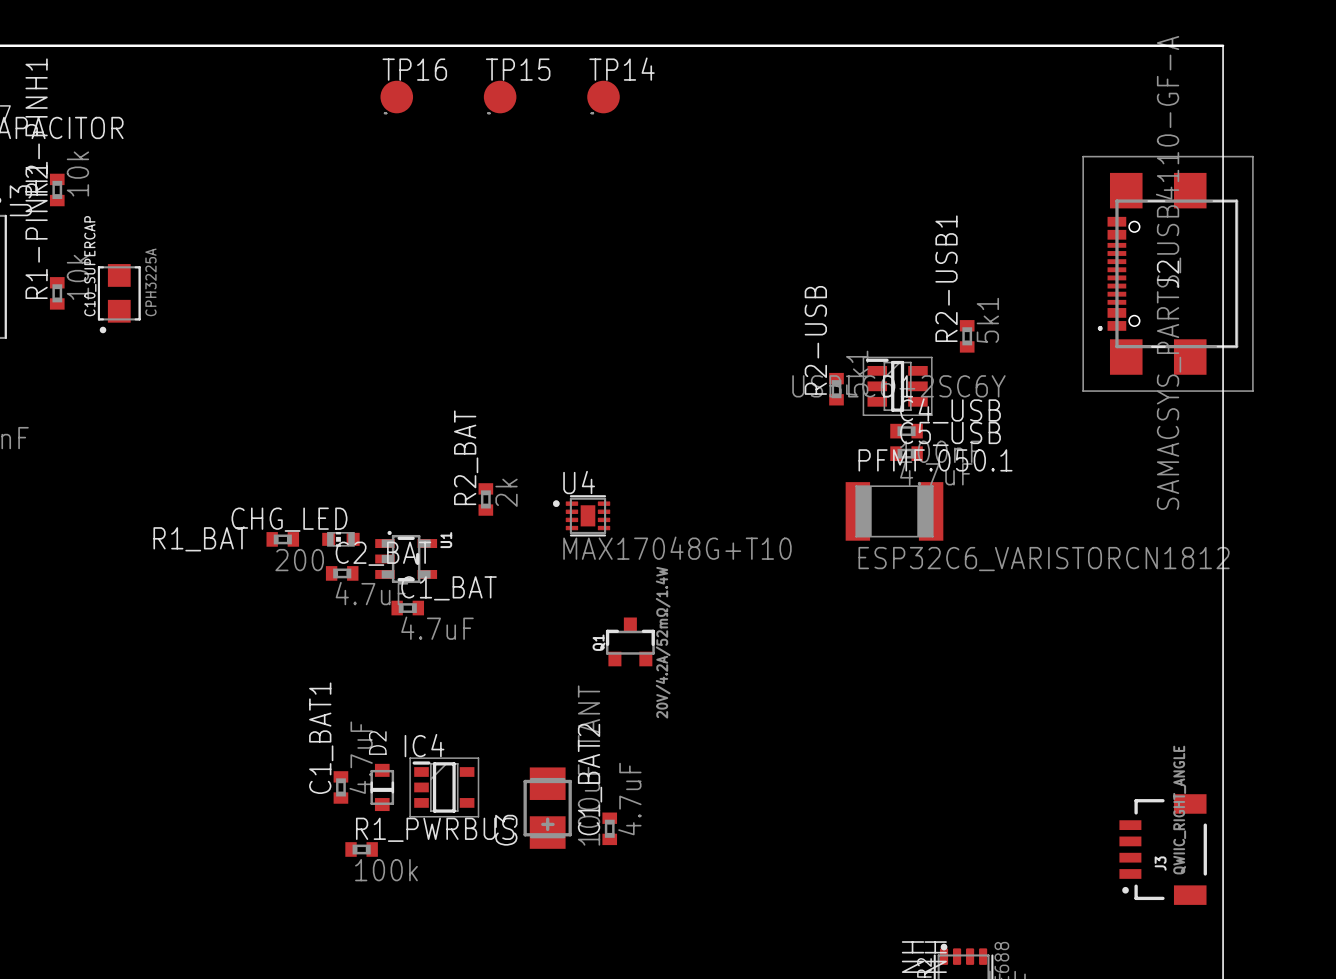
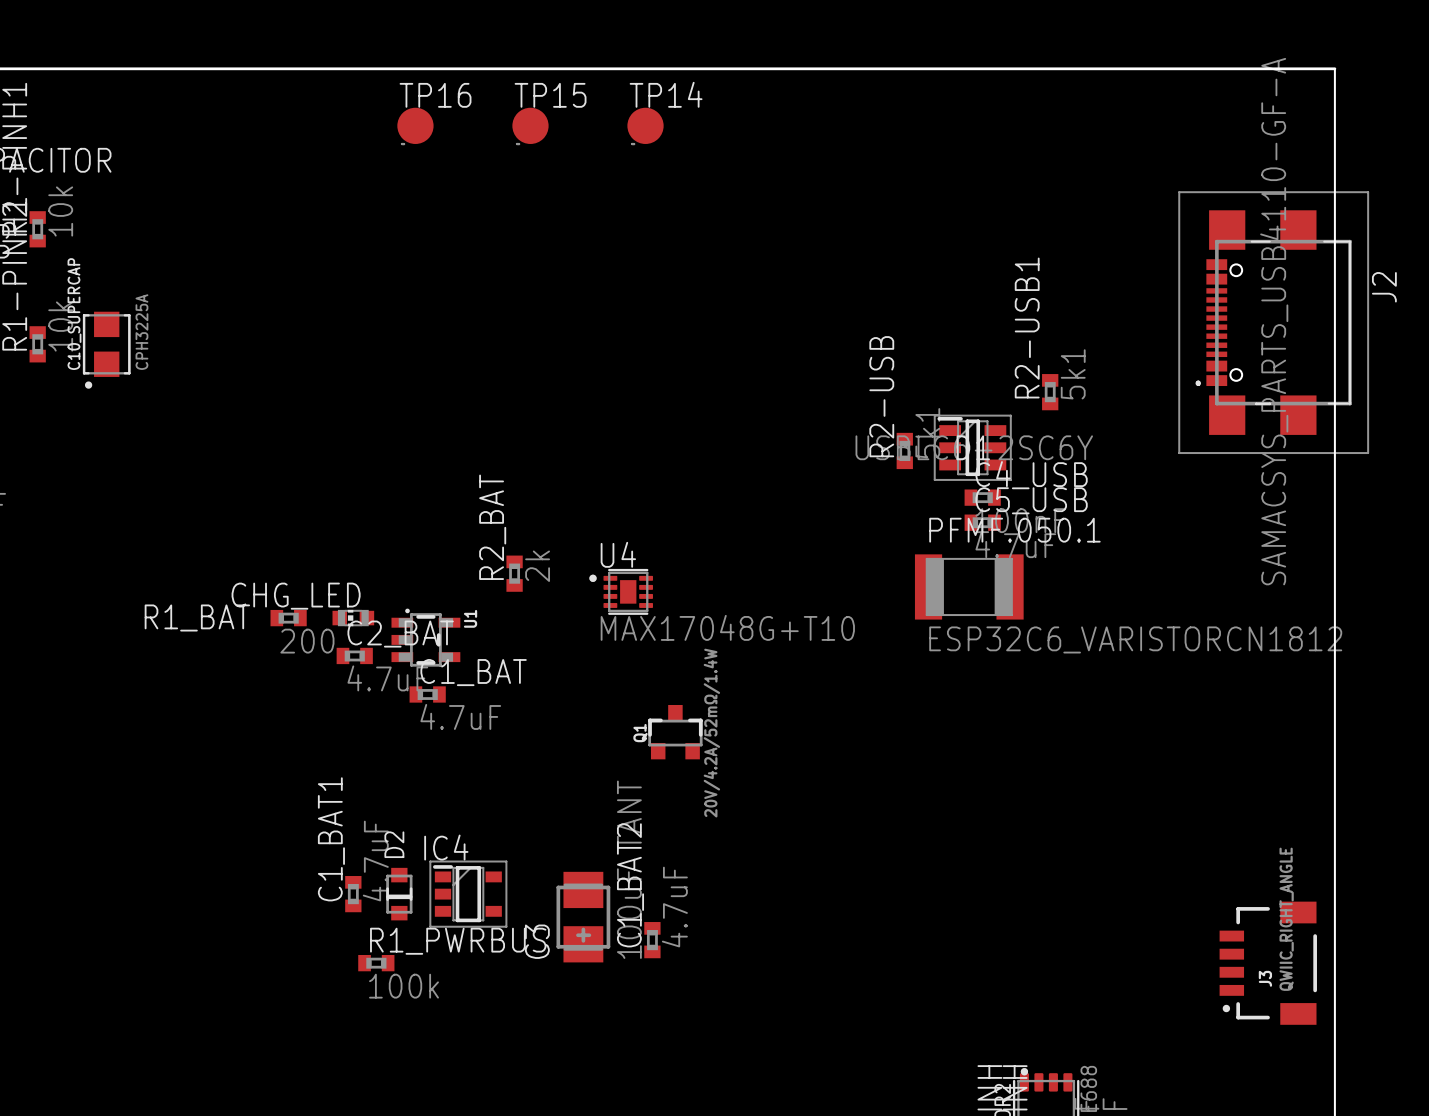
J2 name position: J2 (1168, 274) -> J2 (1384, 287)

